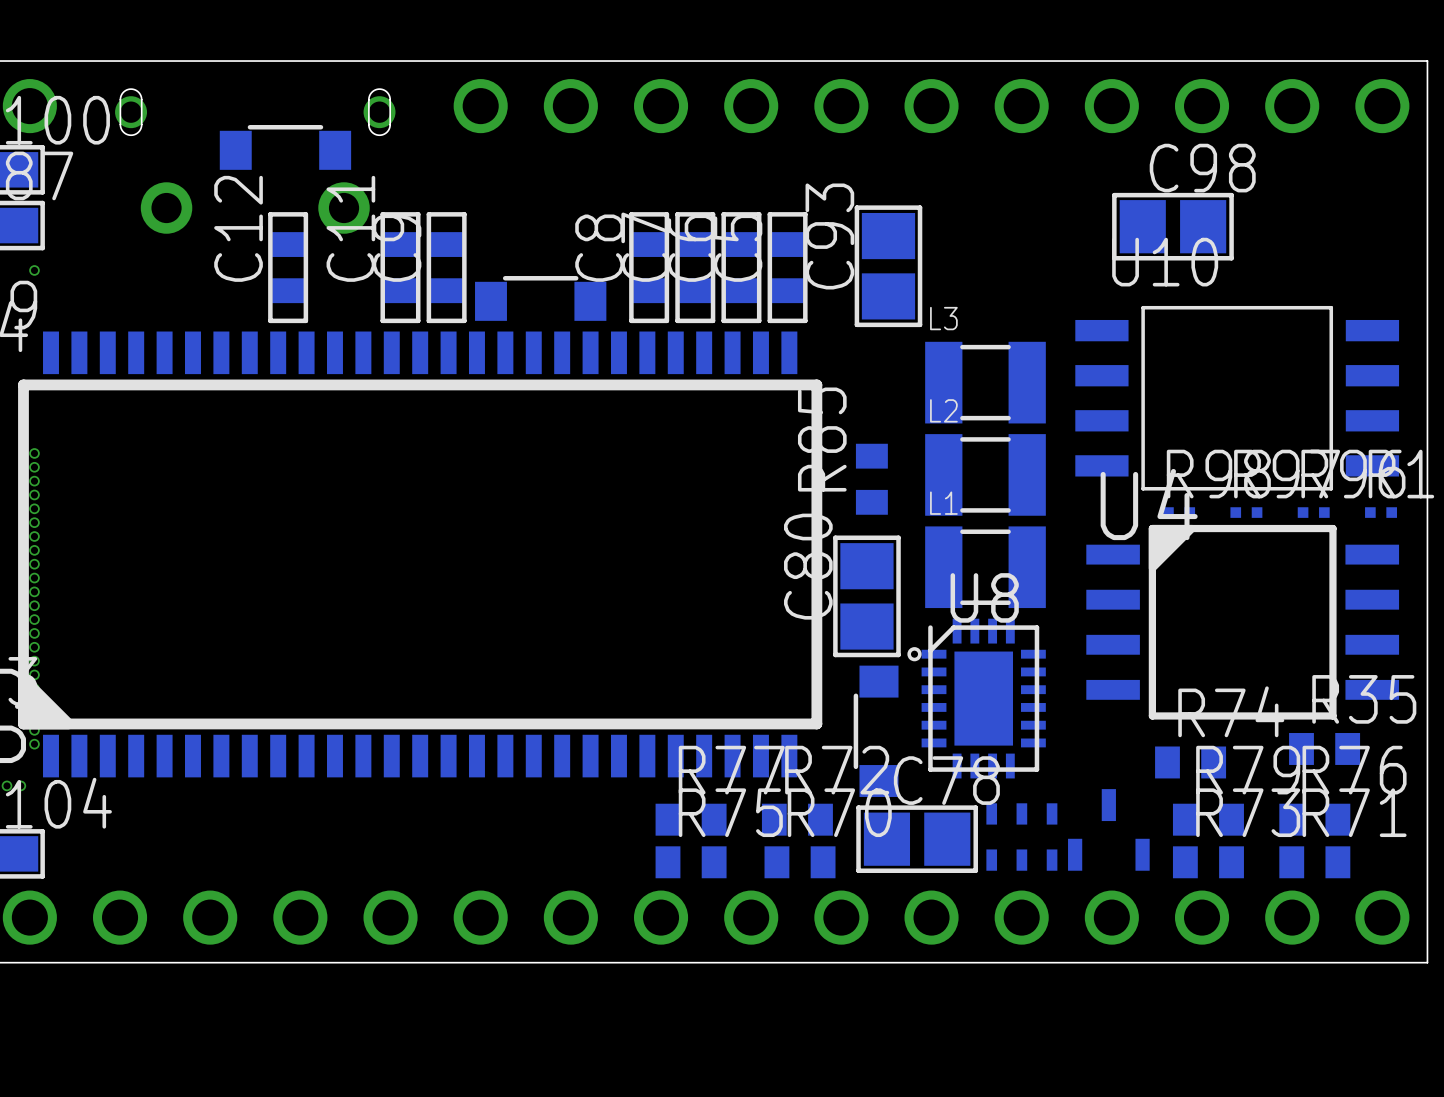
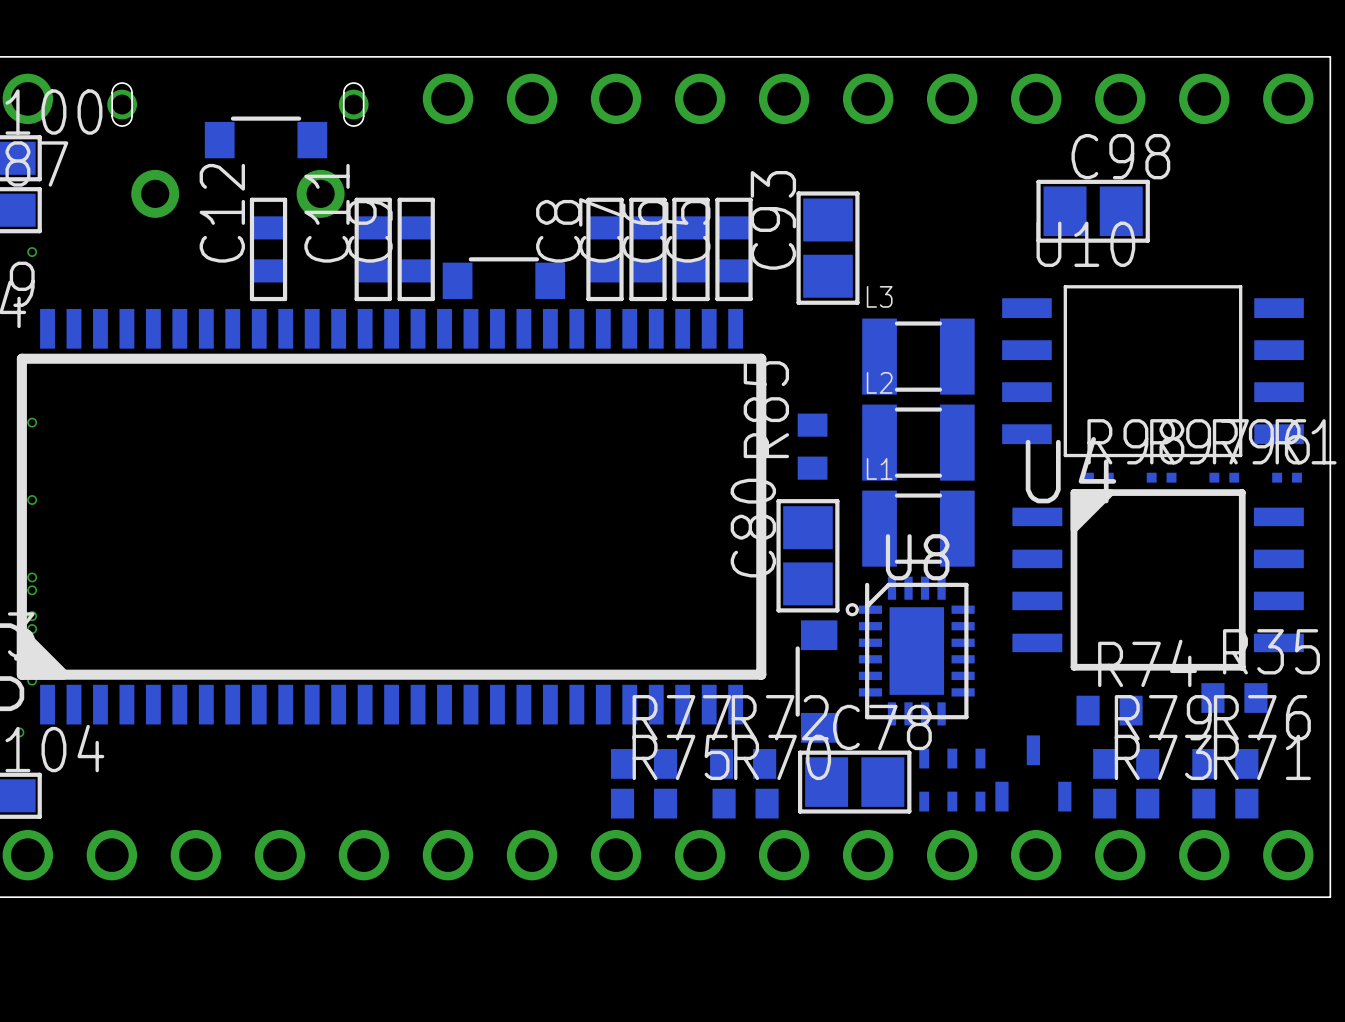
via: (34, 467) -> none
via: (34, 481) -> none
via: (34, 494) -> none
via: (34, 508) -> none
via: (34, 522) -> none
via: (34, 550) -> none
via: (34, 564) -> none
via: (34, 578) -> none
via: (34, 591) -> none
via: (34, 605) -> none
via: (34, 647) -> none
via: (34, 744) -> none
via: (6, 785) -> none

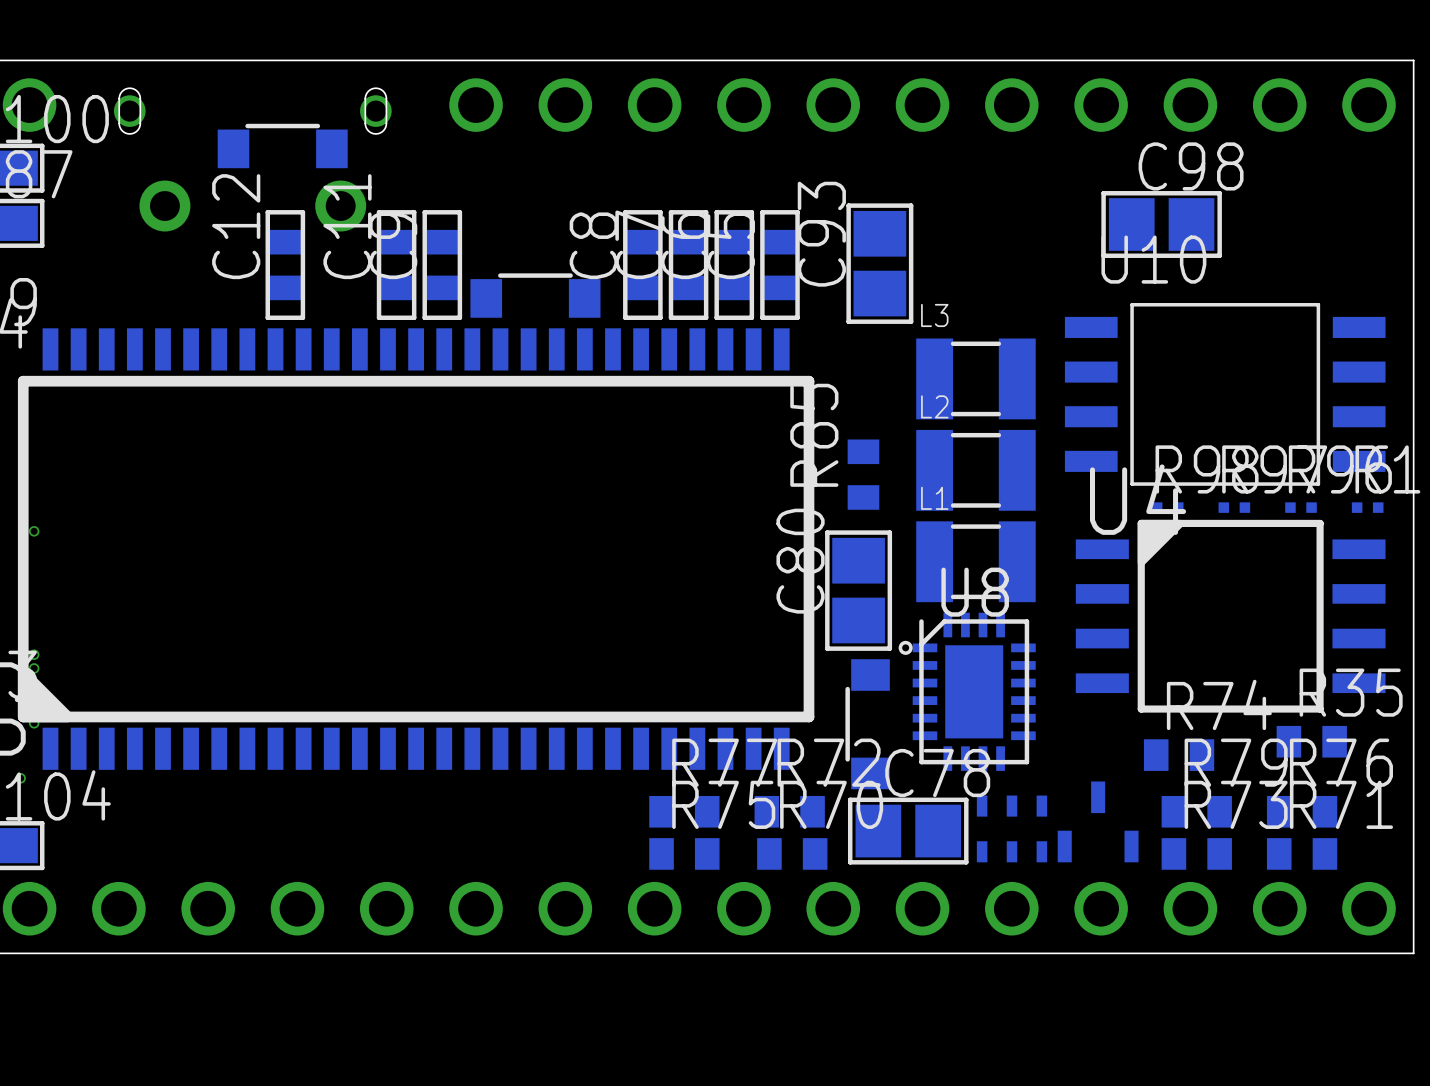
via: (32, 252) -> none
via: (32, 422) -> none
via: (32, 577) -> none
via: (32, 590) -> none

